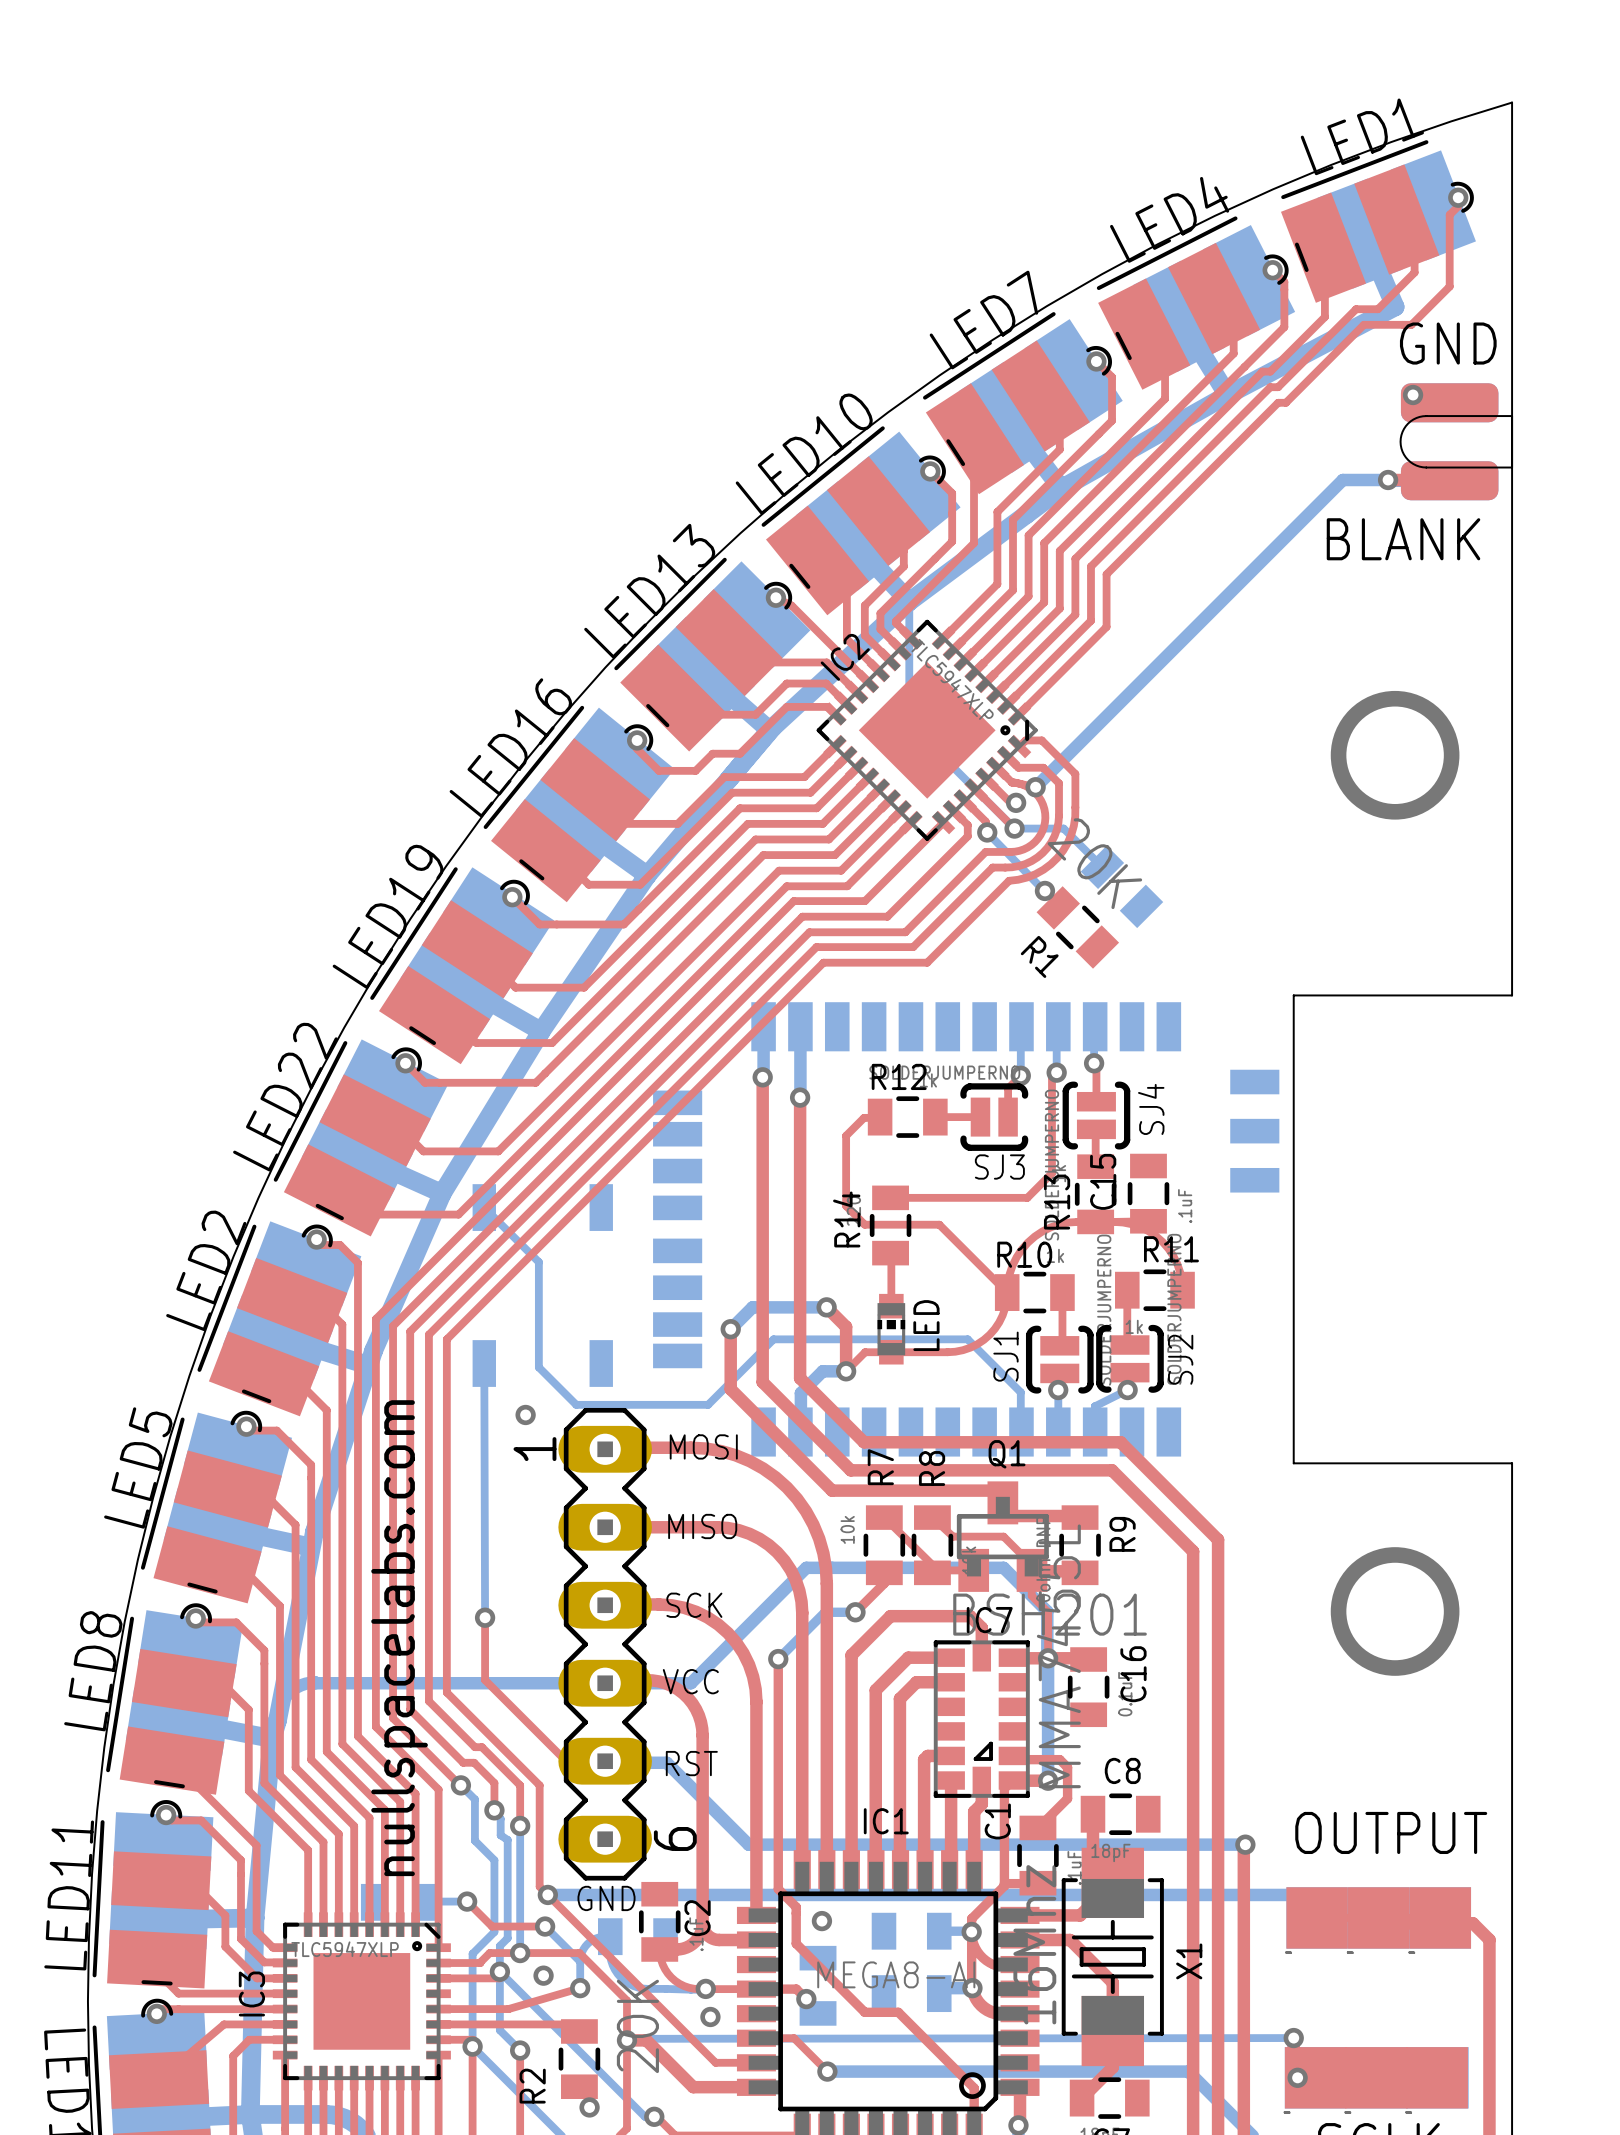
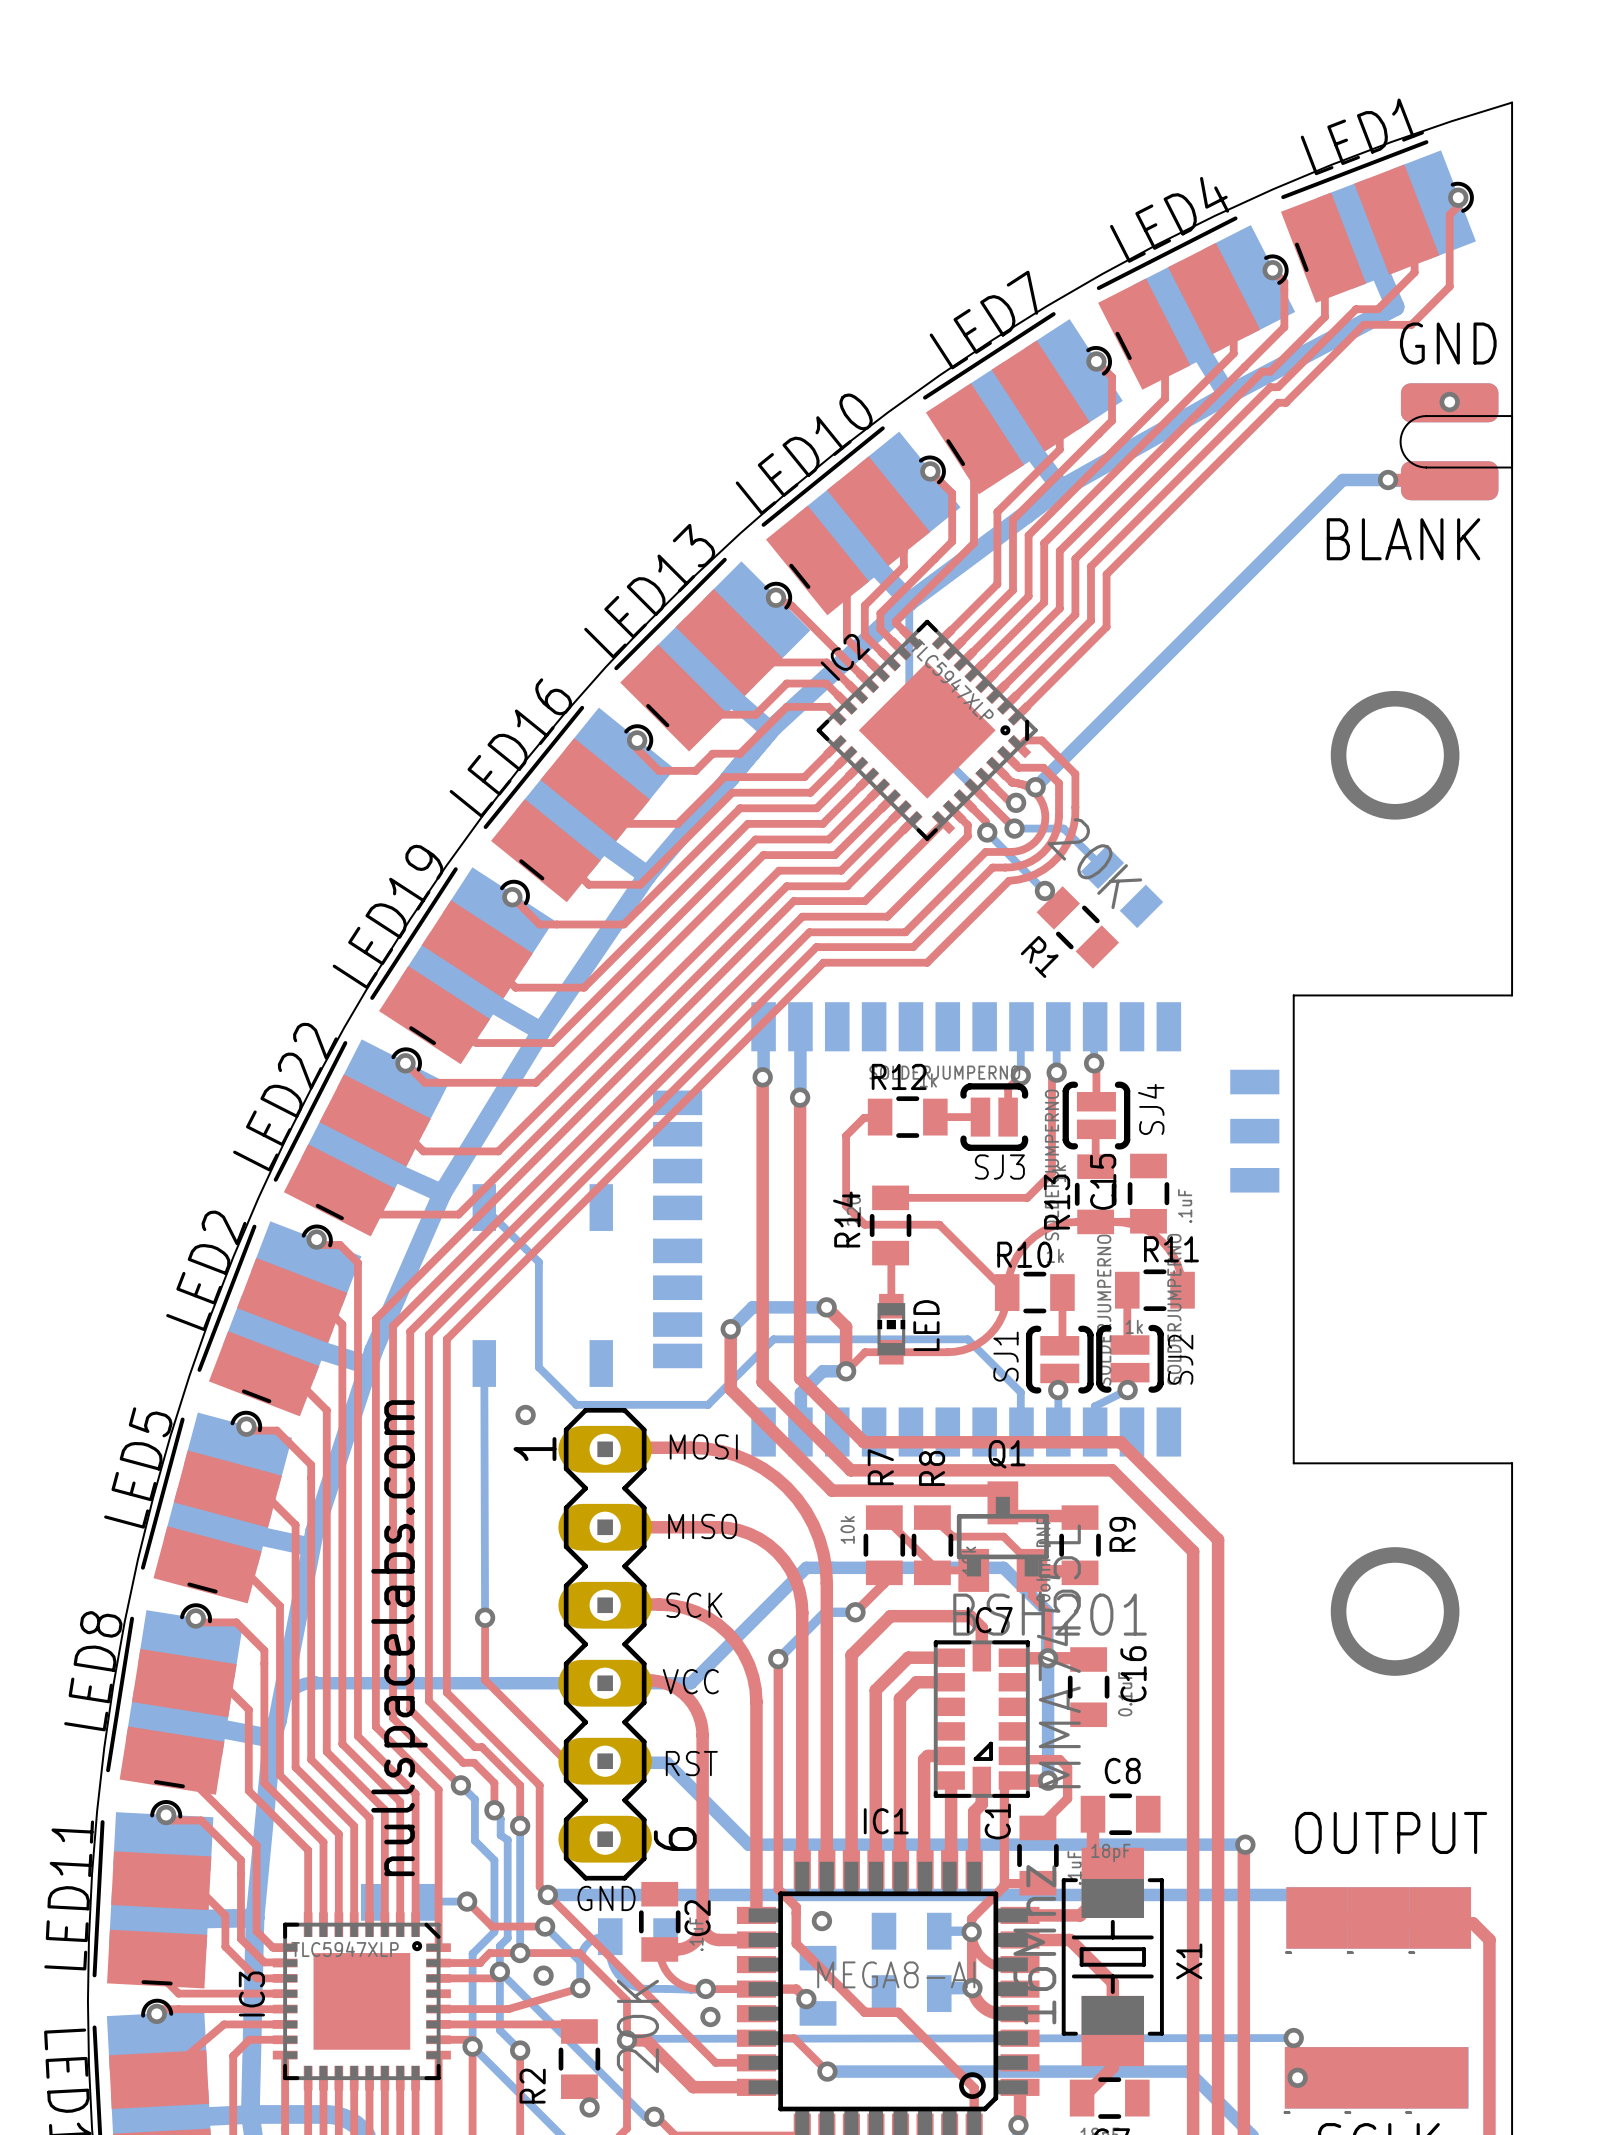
via position: (1413, 394) -> (1449, 402)

